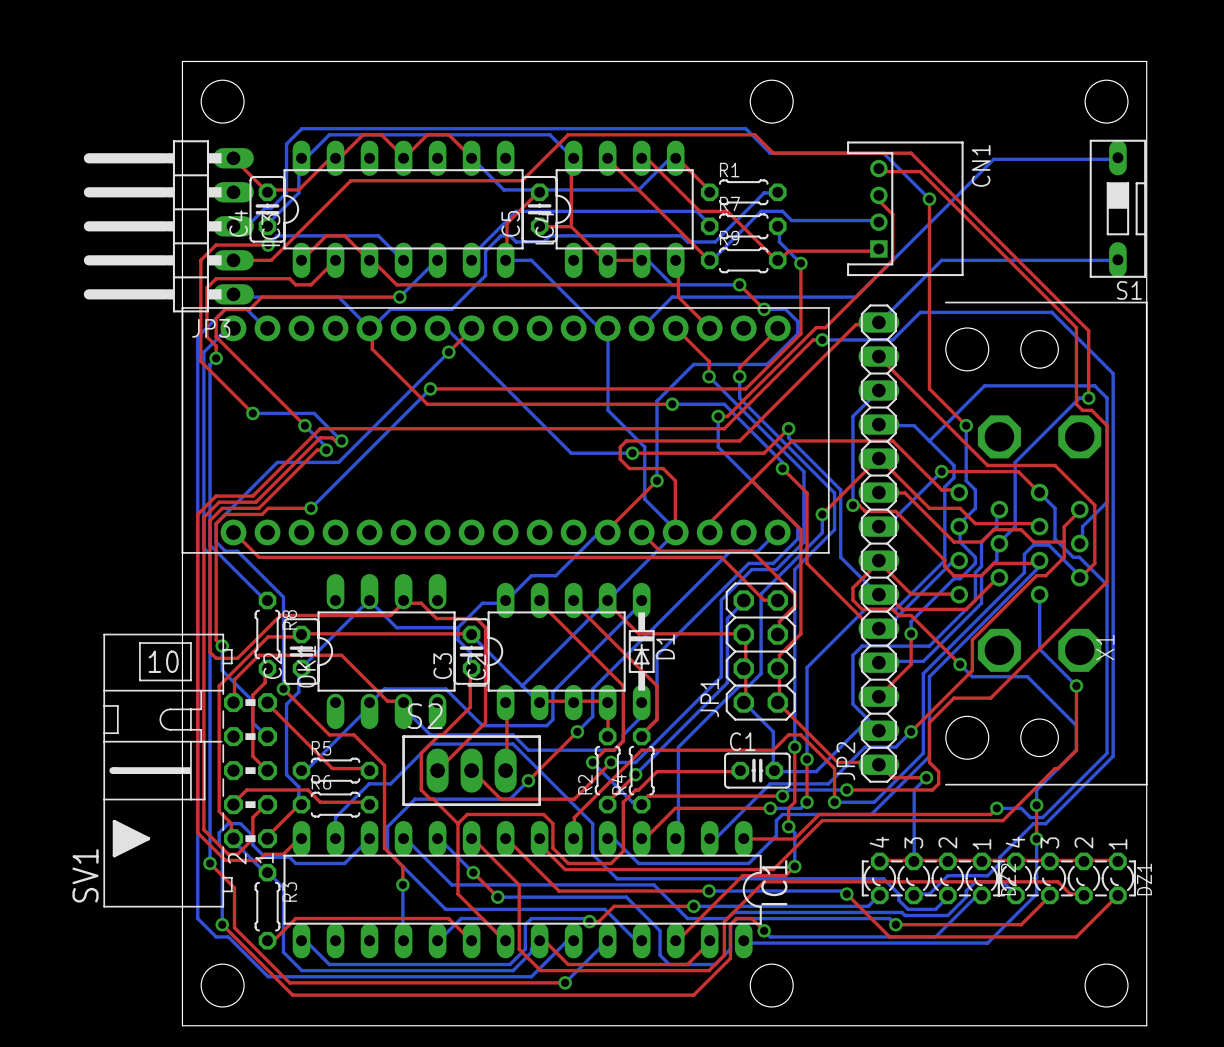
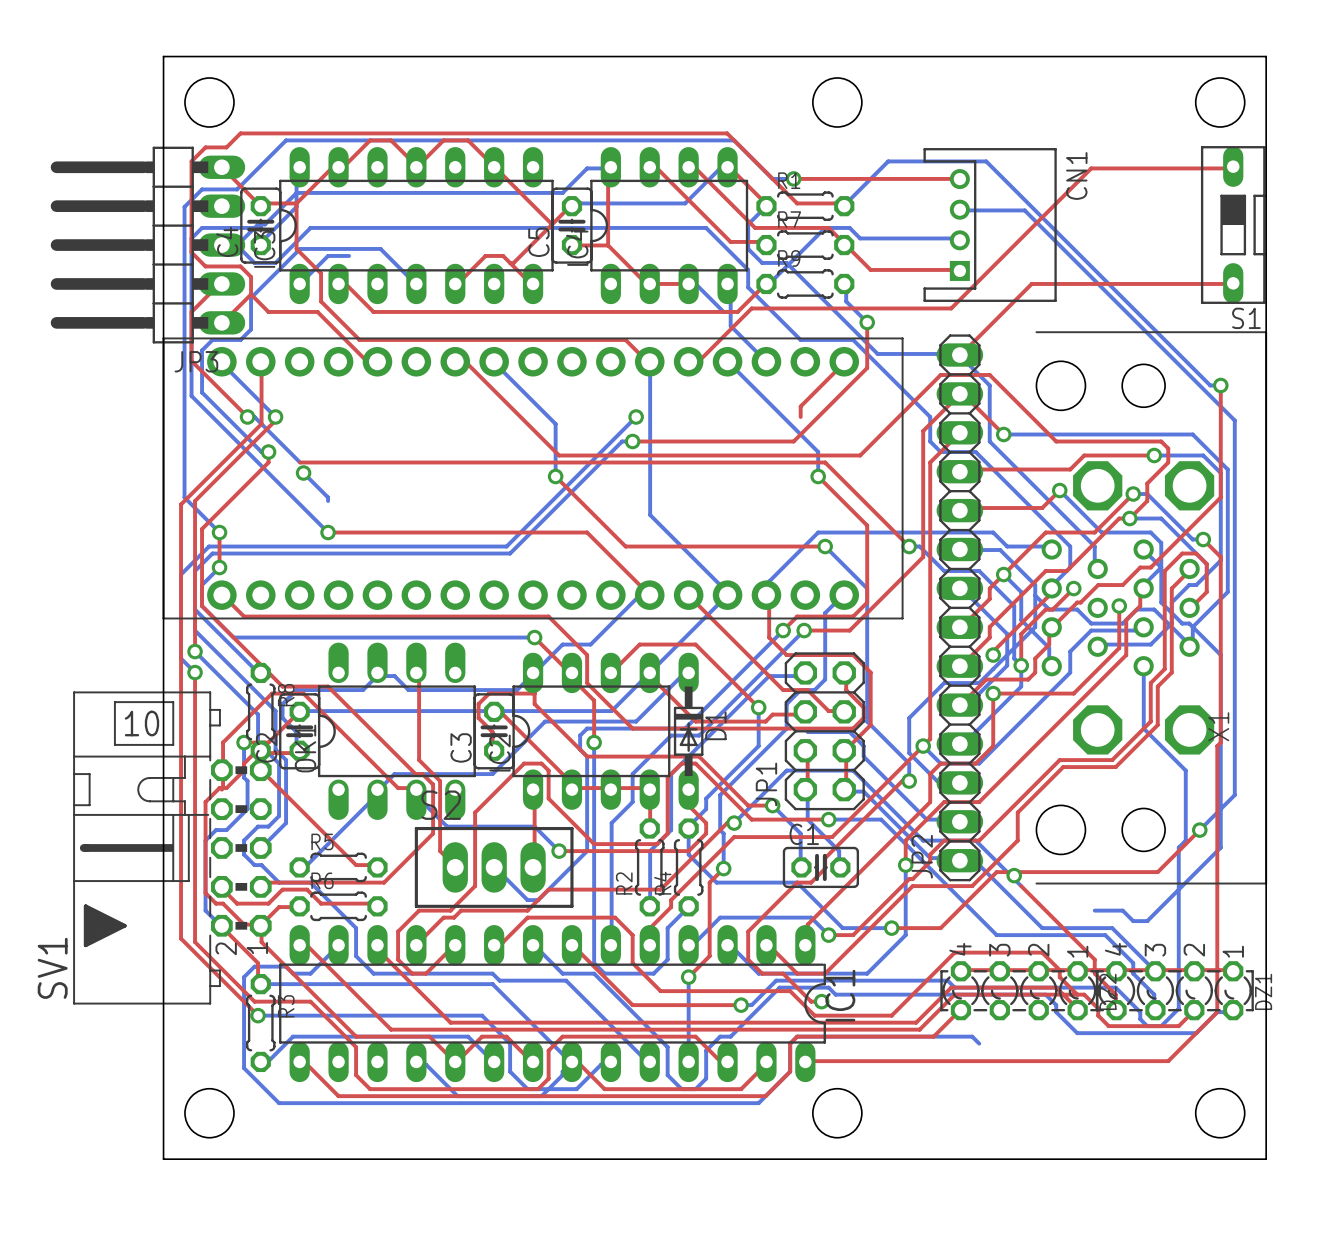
bottom track: (329, 134) (307, 156) (301, 156) (301, 158) -> (331, 140) (286, 140) (237, 189) (202, 189) (184, 206) (184, 497) (219, 532)
bottom track: (549, 134) (573, 158) -> (583, 140) (734, 140) (772, 178) (793, 178)
bottom track: (816, 153) (770, 153) (745, 128) (301, 128) (286, 144) (286, 192) -> (610, 167) (587, 168) (562, 192) (296, 192) (282, 206)
bottom track: (883, 153) (929, 199) -> (965, 161) (986, 161) (1210, 385) (1220, 385)
bottom track: (1117, 157) (1116, 159) (993, 159) (856, 297) (672, 297) (641, 328) -> none
top track: none -> (494, 167) (552, 224)
bottom track: (471, 158) (503, 189) (537, 189) (539, 192) -> none
top track: (608, 159) (709, 260) -> (650, 168) (657, 168) (730, 241) (765, 241) (766, 245)
top track: none -> (793, 178) (959, 179)
via: none -> (793, 178)
top track: (878, 168) (880, 171) (920, 171) (1076, 327) (1076, 404) (1082, 410) (1091, 410) (1107, 425) -> (1220, 385) (1220, 473)
top track: none -> (296, 203) (296, 248) (321, 273) (321, 301) (359, 339) (625, 339) (646, 360) (649, 361)
bottom track: (777, 192) (764, 192) (715, 241) -> (844, 206) (888, 161)
top track: (878, 195) (880, 202) (892, 214) (892, 260) -> (1233, 166) (1231, 168) (1091, 168) (975, 283)
top track: (929, 199) (929, 388) (966, 425) -> none
via: (929, 199) -> none
bottom track: none -> (261, 227) (202, 227) (191, 238) (191, 395) (328, 532)
bottom track: (516, 211) (473, 254) (473, 260) (471, 260) -> (545, 227) (310, 227) (275, 262) (254, 262) (237, 245) (221, 245)
bottom track: (657, 211) (696, 211) (709, 226) -> (706, 227) (734, 255)
top track: (727, 211) (776, 260) (779, 260) (788, 251) (877, 251) (878, 248) -> (786, 227) (828, 227) (870, 269) (959, 270)
top track: (506, 223) (505, 260) -> (534, 241) (513, 262) (510, 262)
bottom track: (777, 226) (779, 226) (779, 241) (800, 263) -> none
bottom track: (326, 235) (277, 235) (268, 245) -> (328, 255) (299, 283)
bottom track: (344, 235) (378, 235) -> (237, 339) (240, 339) (251, 329) (251, 297) (300, 248) (380, 248) (387, 255)
bottom track: (681, 235) (549, 235) (543, 241) (516, 241) (510, 235) (500, 235) (485, 251) (485, 275) (451, 309) (390, 309) (369, 328) (338, 297) (234, 297) (233, 294) -> none
bottom track: (687, 241) (705, 241) -> (766, 206) (748, 224) (748, 248) (762, 262)
bottom track: none -> (741, 262) (748, 269) (748, 287) (800, 339) (828, 339)
bottom track: none -> (772, 262) (786, 262) (877, 353) (959, 355) (989, 385) (989, 441) (1094, 546) (1094, 567) (1097, 568)
top track: (219, 245) (216, 245) (200, 260) (200, 361) (252, 413) -> (205, 266) (191, 252) (191, 161) (205, 147) (226, 147) (240, 133) (727, 133) (797, 203) (842, 203) (844, 206)
top track: (249, 245) (268, 245) -> (240, 266) (251, 276) (251, 294)
via: (268, 245) -> none
bottom track: (1117, 259) (941, 260) (878, 322) -> none
top track: (233, 260) (271, 260) (350, 180) (522, 180) (568, 134) (754, 134) (773, 153) (911, 153) (1088, 330) (1088, 398) -> (221, 283) (219, 283) (191, 311) (191, 315)
top track: (301, 260) (326, 235) (344, 235) (396, 284) -> (338, 283) (345, 283) (373, 311) (408, 311)
top track: (335, 260) (311, 284) -> (377, 361) (366, 360) (317, 311) (310, 311)
top track: none -> (455, 283) (457, 283) (485, 255) (503, 255) (533, 283)
bottom track: (437, 260) (399, 297) -> none
bottom track: (505, 260) (531, 260) (598, 327) (607, 328) -> none
top track: (675, 260) (678, 260) (678, 297) (709, 328) -> none
bottom track: none -> (727, 283) (730, 283) (730, 325) (766, 361)
top track: none -> (765, 283) (737, 311) (730, 311)
bottom track: none -> (844, 283) (846, 283) (846, 301) (867, 322)
top track: (800, 263) (800, 333) (745, 388) (430, 388) -> none
via: (800, 263) -> none
top track: none -> (251, 294) (221, 322)
top track: (871, 281) (825, 327) (816, 327) (727, 416) -> (951, 308) (751, 308) (699, 360) (688, 361)
top track: (295, 284) (289, 278) (216, 278) (206, 287) -> (293, 311) (268, 311) (251, 294)
bottom track: (678, 284) (739, 284) -> none
top track: (739, 284) (764, 309) -> none
via: (739, 284) -> none
top track: none -> (867, 322) (867, 367) (793, 441) (632, 441)
via: none -> (867, 322)
top track: (399, 297) (262, 297) (249, 309) (225, 309) (216, 318) (216, 336) -> none
via: (399, 297) -> none
bottom track: (246, 309) (267, 328) -> none
via: (764, 309) -> none
bottom track: (1051, 312) (920, 312) (892, 339) (822, 339) -> (1157, 343) (1024, 210) (959, 209)
bottom track: (216, 318) (197, 336) (197, 514) -> (202, 350) (202, 392) (261, 452) (268, 452)
bottom track: (797, 321) (797, 333) (767, 364) (693, 364) (657, 401) (657, 480) -> none
top track: (878, 322) (877, 324) (856, 324) (739, 440) (626, 440) (620, 447) (620, 459) (629, 468) (663, 468) (675, 480) (675, 532) -> (959, 355) (1031, 283) (1233, 283)
top track: (206, 327) (206, 336) (216, 346) (216, 358) -> (191, 360) (202, 371)
bottom track: (233, 328) (231, 330) (225, 330) (203, 352) (203, 548) (210, 554) -> (221, 361) (275, 416)
top track: (369, 328) (372, 330) (372, 349) (427, 404) (672, 404) -> none
bottom track: (437, 328) (439, 330) (448, 330) (571, 453) (632, 453) -> none
top track: (471, 328) (448, 352) -> none
bottom track: none -> (494, 361) (555, 424) (555, 476)
top track: (675, 328) (709, 361) (709, 376) -> none
bottom track: none -> (727, 361) (818, 452) (818, 476)
top track: (822, 339) (813, 339) (724, 428) (320, 428) (252, 496) (216, 496) (197, 514) -> (260, 361) (261, 424) (181, 504) (181, 574)
via: (822, 339) -> none
via: none -> (1220, 385)
bottom track: (448, 352) (338, 462) (277, 462) (231, 508) -> none
via: (448, 352) -> none
top track: (878, 356) (987, 465) (1018, 465) -> none
bottom track: (216, 358) (210, 364) (210, 511) -> (632, 441) (622, 441) (510, 553) (212, 553) (195, 571)
via: (216, 358) -> none
bottom track: (1113, 373) (1113, 422) -> (1003, 434) (1192, 434) (1227, 469)
bottom track: none -> (1227, 413) (1234, 420) (1234, 795) (1199, 830)
top track: (255, 376) (304, 425) -> none
bottom track: none -> (247, 416) (254, 416) (300, 462)
via: none -> (247, 416)
via: none -> (275, 416)
bottom track: none -> (636, 416) (506, 546) (209, 546) (181, 574)
via: none -> (636, 416)
bottom track: (709, 376) (803, 471) (803, 542) (776, 569) (751, 569) (721, 600) (721, 676) (635, 762) (611, 762) -> none
via: (709, 376) -> none
bottom track: (739, 376) (739, 398) (834, 493) (834, 529) (794, 569) (794, 664) -> (807, 732) (849, 732) (863, 746)
via: (739, 376) -> none
bottom track: (430, 388) (311, 508) -> none
via: (430, 388) -> none
bottom track: (878, 390) (852, 416) (852, 505) -> none
top track: none -> (1003, 434) (961, 392) (959, 393) (923, 431) (923, 557) (849, 630) (804, 630)
via: none -> (1003, 434)
via: none -> (632, 441)
bottom track: (1088, 398) (1079, 398) (1015, 462) (1015, 526) (996, 545) (996, 560) (993, 563) -> (1140, 630) (1091, 630)
via: (1088, 398) -> none
bottom track: (672, 404) (724, 404) (782, 462) (782, 468) -> none
via: (672, 404) -> none
via: none -> (268, 452)
bottom track: (608, 410) (644, 447) (644, 499) -> (650, 455) (650, 515) (692, 557)
top track: none -> (1154, 455) (1084, 455) (1070, 469) (961, 469) (959, 471)
via: none -> (1154, 455)
bottom track: (252, 413) (314, 413) (341, 440) -> none
via: (252, 413) -> none
top track: none -> (300, 462) (776, 462)
bottom track: (718, 416) (718, 447) (761, 489) -> none
via: (718, 416) -> none
top track: none -> (786, 462) (825, 462) (909, 546)
bottom track: (878, 424) (914, 425) (953, 465) (953, 477) (944, 486) (944, 523) -> (959, 549) (1000, 550) (1035, 585)
bottom track: (966, 425) (966, 480) -> (867, 353) (930, 416) (930, 441) (940, 452) (975, 452) (1059, 536)
via position: (966, 425) -> (1059, 490)
bottom track: (1107, 425) (1107, 398) (1094, 385) (984, 385) (929, 440) -> (1220, 473) (1203, 455) (1154, 455)
top track: none -> (555, 476) (625, 546) (825, 546)
via: none -> (555, 476)
top track: none -> (818, 476) (867, 525) (867, 602) (853, 616) (814, 616)
via: none -> (818, 476)
top track: (788, 428) (764, 453) (632, 453) -> none
bottom track: (788, 428) (788, 437) (840, 489) (840, 557) (878, 594) -> none
via: (788, 428) -> none
top track: (341, 440) (335, 440) (332, 437) (320, 437) (255, 502) (219, 502) (203, 517) (203, 829) (210, 835) -> (195, 732) (195, 942)
via: (341, 440) -> none
top track: none -> (1059, 490) (1042, 508) (961, 508) (959, 510)
bottom track: none -> (1059, 490) (1101, 532) (1150, 532) (1161, 543) (1161, 567) (1143, 585) (1143, 588)
top track: none -> (1133, 494) (1094, 532) (1045, 532) (989, 588) (989, 599) (959, 627)
bottom track: none -> (1133, 494) (1147, 494) (1192, 539) (1203, 539)
via: none -> (1133, 494)
top track: (1107, 447) (1107, 499) -> (1203, 539) (1220, 557)
top track: (326, 450) (317, 450) (259, 508) (222, 508) (210, 520) -> (275, 416) (275, 420) (195, 501) (195, 581)
via: (326, 450) -> none
via: (632, 453) -> none
top track: (1027, 465) (1055, 465) (1085, 496) -> (1129, 518) (1147, 501) (1147, 483) (1168, 462) (1168, 448) (1161, 441) (1056, 441) (989, 374) (940, 374) (860, 455) (559, 455) (468, 364) (457, 364) (455, 361)
bottom track: none -> (1129, 518) (1161, 518) (1206, 564) (1206, 574)
via: none -> (1129, 518)
top track: (782, 468) (807, 493) (807, 563) (871, 627) (878, 628) -> none
via: (782, 468) -> none
top track: (941, 471) (1018, 471) (1039, 492) -> none
bottom track: (941, 471) (889, 523) (880, 523) (878, 526) -> none
via: (941, 471) -> none
top track: none -> (219, 532) (219, 567)
via: none -> (219, 532)
via: none -> (328, 532)
top track: (657, 480) (608, 529) (607, 532) -> (328, 532) (587, 532) (649, 595)
via: (657, 480) -> none
top track: (751, 480) (800, 529) (800, 600) -> none
via: none -> (1203, 539)
via: none -> (825, 546)
via: none -> (909, 546)
top track: (878, 492) (904, 493) (953, 542) (981, 542) (984, 538) -> (959, 705) (986, 679) (1028, 679) (1035, 672) (1035, 658) (1049, 644) (1049, 630) (1077, 602) (1080, 602)
top track: (959, 492) (957, 489) (941, 489) (892, 440) (791, 440) (712, 520) (712, 529) (709, 532) -> none
bottom track: none -> (1051, 549) (1049, 546) (1007, 546) (993, 532) (818, 532) (769, 581) (769, 592) (766, 595)
top track: (852, 505) (859, 505) (865, 511) (895, 511) (944, 560) (944, 566) (953, 575) (981, 575) (993, 563) (1036, 563) (1039, 560) -> none
via: (852, 505) -> none
via: none -> (219, 567)
top track: (311, 508) (268, 508) (262, 514) (225, 514) (216, 523) -> (268, 452) (268, 462) (202, 529) (202, 585)
via: (311, 508) -> none
bottom track: (999, 509) (996, 511) (996, 526) (981, 542) (981, 566) (975, 572) (975, 581) -> (1077, 644) (1070, 651)
top track: (822, 514) (878, 458) (929, 508) (960, 508) (975, 523) (999, 523) -> none
bottom track: (822, 514) (822, 532) (761, 594) -> (825, 613) (825, 665)
via: (822, 514) -> none
bottom track: none -> (1003, 574) (1021, 592) (1021, 620) (1049, 648) (1049, 665) (1051, 666)
via: none -> (1003, 574)
top track: (1021, 523) (1036, 523) (1039, 526) -> (1122, 585) (1140, 567) (1150, 567) (1220, 497)
bottom track: (1085, 523) (1082, 526) (1082, 542) -> (1196, 585) (1189, 585) (1171, 602) (1171, 623) (1150, 644) (1098, 644) (1097, 646)
top track: none -> (1051, 588) (1049, 588) (1049, 595) (993, 651) (993, 655)
bottom track: (959, 526) (960, 542) (975, 557) (975, 563) (960, 578) (953, 578) (911, 621) (911, 633) -> none
top track: none -> (1073, 588) (1052, 609) (1045, 609) (1021, 634) (1021, 665)
via: none -> (1073, 588)
top track: none -> (1143, 588) (1140, 588) (1140, 606) (1126, 620) (1126, 655) (979, 802) (944, 802) (905, 840) (905, 865)
top track: (993, 529) (1021, 529) (1033, 542) (1064, 542) -> (1091, 592) (1098, 585)
top track: (1094, 529) (1094, 563) (1079, 577) -> (1206, 592) (1189, 607)
bottom track: (1113, 529) (1113, 756) (1045, 823) (1033, 823) (999, 857) (999, 863) (987, 875) -> (1227, 592) (1192, 627) (1192, 644) (1189, 646)
bottom track: (797, 538) (773, 563) (748, 563) (657, 655) (657, 710) -> (758, 707) (758, 746) (706, 798)
bottom track: none -> (867, 602) (867, 721) (909, 763) (909, 781)
top track: (216, 542) (216, 639) (222, 646) -> (202, 606) (282, 686) (328, 686) (415, 774) (422, 774) (433, 784) (433, 833) (384, 882) (265, 882) (260, 886)
via: none -> (1119, 606)
bottom track: (761, 548) (758, 551) (730, 551) (626, 655) -> (804, 630) (699, 735) (671, 735)
bottom track: (225, 551) (237, 551) (283, 597) (283, 679) -> (195, 651) (258, 714) (258, 742) (279, 763)
bottom track: none -> (212, 616) (233, 637) (534, 637)
top track: (252, 551) (259, 557) (721, 557) (764, 600) (777, 600) -> (244, 616) (548, 616) (587, 655) (587, 683) (632, 728) (853, 728)
top track: (660, 551) (736, 551) -> (783, 630) (797, 616)
top track: none -> (709, 616) (783, 690) (807, 690) (828, 711) (844, 711)
top track: (751, 551) (785, 584) -> (766, 595) (769, 595) (769, 637) (786, 655) (853, 655)
bottom track: (1024, 554) (1024, 572) (923, 673) (923, 753) (874, 802) (834, 802) -> (1126, 620) (1122, 623) (1091, 623) (1077, 609) (1049, 609) (1035, 595)
top track: (1064, 557) (1045, 575) (1036, 575) (972, 639) (972, 670) (966, 676) -> (1171, 623) (1171, 672) (1157, 686) (1157, 725) (1115, 767) (1063, 767) (1045, 784)
bottom track: (959, 560) (957, 563) (950, 563) (920, 594) -> (959, 588) (1007, 634) (1007, 665)
bottom track: (210, 563) (210, 863) -> (195, 630) (275, 711) (275, 749) (286, 760) (286, 823) (260, 847)
via: none -> (783, 630)
via: none -> (804, 630)
bottom track: (1036, 563) (1036, 569) (929, 676) (929, 756) (871, 814) (782, 814) (776, 820) (776, 835) (748, 863) -> (905, 865) (905, 935) (867, 973) (811, 973)
top track: none -> (534, 637) (571, 672) (569, 676) (594, 700) (594, 742)
via: none -> (534, 637)
bottom track: (981, 575) (981, 603) (923, 661) (878, 662) -> (909, 546) (919, 546) (944, 571) (979, 571) (1014, 606) (1014, 658) (1021, 665) (1021, 686) (961, 746) (959, 744)
top track: (999, 577) (966, 609) (901, 609) (889, 597) (880, 597) (878, 594) -> (1119, 518) (1066, 571) (1045, 571) (989, 627) (989, 637) (959, 666)
top track: (210, 581) (210, 600) -> none
via: none -> (195, 651)
top track: (1107, 581) (1045, 643) -> (1196, 553) (1182, 553) (1164, 571) (1164, 669) (1150, 683) (1150, 721)
top track: none -> (1220, 651) (1220, 742) (1217, 746) (1217, 1012) (1168, 1061) (805, 1061)
via: none -> (993, 655)
bottom track: (197, 587) (197, 918) (216, 936) (228, 936) (268, 976) (283, 976) -> (181, 658) (195, 672)
top track: (852, 587) (878, 560) (911, 594) (959, 594) -> (930, 658) (930, 462) (959, 432)
top track: (794, 594) (794, 606) (779, 621) (779, 633) (777, 634) -> (863, 665) (870, 672)
via: none -> (1021, 665)
via: none -> (195, 672)
bottom track: (369, 600) (298, 670) (298, 692) (286, 704) (286, 774) (298, 786) (298, 802) (301, 804) -> (377, 672) (377, 676) (363, 690) (296, 690) (282, 704) (282, 718) (296, 732) (296, 749) (299, 750)
top track: (403, 600) (390, 615) (280, 615) (277, 618) -> none
top track: none -> (533, 672) (534, 704) (587, 756) (699, 756) (748, 805) (772, 805)
top track: (539, 600) (623, 685) (623, 692) -> (828, 819) (751, 819) (695, 763) (681, 763) (667, 777)
top track: (573, 600) (657, 685) (657, 719) (641, 736) -> (610, 672) (639, 644) (695, 644) (758, 707)
top track: (852, 600) (862, 609) (892, 609) (898, 615) (911, 615) (960, 664) -> none
bottom track: (372, 603) (396, 627) (458, 627) -> (380, 676) (394, 676) (408, 690) (517, 690) (531, 676)
top track: (405, 603) (421, 603) (436, 618) (467, 618) -> none
bottom track: (503, 603) (482, 603) (458, 627) -> none
bottom track: (641, 603) (552, 692) -> (783, 630) (685, 728) (587, 728) (580, 735) (580, 749) (587, 756) (587, 777)
bottom track: none -> (688, 676) (681, 676) (636, 721) (545, 721) (492, 774) (464, 774)
bottom track: (742, 603) (727, 618) (727, 627) -> (825, 679) (814, 690) (800, 690) (786, 704)
bottom track: (761, 606) (761, 673) (748, 685) -> none
top track: (476, 618) (485, 627) (485, 722) (437, 770) -> (419, 676) (419, 760) (440, 781) (440, 851) (455, 867)
top track: none -> (499, 693) (534, 693)
bottom track: (458, 627) (458, 639) (470, 652) (471, 668) -> none
via: none -> (758, 707)
bottom track: (574, 633) (522, 685) -> (611, 711) (299, 711)
top track: (638, 633) (742, 633) (745, 636) (745, 667) (743, 668) -> (685, 711) (695, 721) (765, 721) (772, 714) (804, 714) (805, 711)
top track: (800, 633) (794, 639) -> (844, 672) (846, 676) (846, 690) (863, 707) (863, 718)
top track: (911, 633) (911, 664) (878, 696) -> none
via position: (911, 633) -> (993, 693)
top track: (301, 634) (471, 634) -> (571, 789) (569, 788) (569, 781) (503, 714) (496, 714) (494, 711)
bottom track: (471, 634) (539, 702) -> none
top track: (298, 636) (268, 636) (219, 685) (219, 713) -> (299, 750) (296, 753) (254, 753) (244, 763) (244, 770) (226, 788) (219, 788) (205, 802)
top track: none -> (296, 714) (268, 742) (244, 742)
bottom track: (834, 639) (807, 667) (807, 759) -> (909, 718) (909, 753) (937, 781) (958, 781) (959, 782)
bottom track: (222, 646) (222, 670) (252, 701) (252, 722) (267, 736) -> none
via: (222, 646) -> none
bottom track: (929, 646) (862, 646) (852, 655) (852, 704) (877, 728) -> (1017, 725) (979, 763) (940, 763) (923, 746)
bottom track: (727, 649) (727, 682) (635, 774) -> (786, 728) (720, 795) (720, 830) (723, 833) (723, 868)
top track: (785, 649) (779, 655) (779, 667) -> (870, 711) (870, 725) (846, 749)
top track: (210, 652) (216, 658) (237, 658) -> (223, 763) (223, 742) (226, 739)
top track: (341, 655) (259, 655) (234, 679) -> (345, 735) (303, 693) (272, 693)
bottom track: none -> (244, 742) (244, 777) (247, 781) (247, 809) (226, 830) (216, 830) (205, 840) (205, 910) (221, 925)
via: none -> (244, 742)
via: none -> (594, 742)
via: none -> (923, 746)
bottom track: (960, 664) (972, 676) (1027, 676) (1076, 725) -> (1185, 770) (1185, 816)
via: (960, 664) -> none
top track: (267, 668) (265, 670) (265, 682) (252, 695) (252, 756) (267, 770) -> none
top track: (471, 668) (470, 707) -> (494, 750) (492, 732) (478, 718) (478, 704) (489, 693)
bottom track: (794, 673) (794, 747) -> (863, 756) (926, 819) (958, 819)
top track: (1012, 676) (990, 698) (953, 698) -> (1112, 760) (1059, 760)
bottom track: (739, 685) (678, 747) (678, 835) (675, 838) -> (800, 770) (786, 770) (734, 823)
top track: (1076, 685) (1076, 750) -> (1199, 830) (1185, 844)
via: (1076, 685) -> none
top track: (283, 688) (329, 734) (353, 734) (384, 765) (384, 848) (387, 851) -> none
via: (283, 688) -> none
bottom track: (445, 688) (482, 725) (546, 725) (552, 719) -> (559, 879) (587, 851) (587, 809)
via: none -> (909, 781)
top track: (267, 702) (332, 768) (350, 768) -> (260, 770) (356, 865)
top track: none -> (688, 789) (688, 805) (706, 823) (706, 833) (688, 851) (559, 851)
bottom track: (641, 702) (641, 716) (623, 734) (623, 741) -> (804, 676) (769, 676) (671, 774) (671, 830) (667, 833)
top track: (777, 702) (837, 762) (877, 762) (892, 777) (926, 777) -> none
bottom track: none -> (844, 789) (846, 791) (863, 791) (930, 858) (958, 858) (961, 861) (975, 861) (1042, 928) (1112, 928) (1155, 971)
bottom track: (745, 704) (773, 731) (773, 756) -> (807, 791) (807, 819) (839, 851)
bottom track: (592, 713) (592, 716) (577, 731) -> (632, 802) (611, 823) (610, 945)
bottom track: none -> (772, 805) (800, 833) (801, 867)
via: none -> (772, 805)
bottom track: (868, 719) (816, 771) (774, 770) -> none
top track: (454, 722) (421, 753) (421, 789) (430, 799) (433, 799) (458, 823) -> (475, 812) (475, 886) (450, 910) (419, 910) (398, 931) (398, 959)
bottom track: none -> (828, 819) (881, 819) (996, 935) (1105, 935) (1133, 963) (1133, 973) (1154, 994) (1155, 1010)
via: none -> (828, 819)
top track: (577, 731) (528, 780) -> none
via: (577, 731) -> none
top track: none -> (734, 823) (727, 823) (660, 889) (548, 889) (527, 910) (461, 910) (454, 917) (443, 917) (416, 945)
via: none -> (734, 823)
top track: none -> (996, 823) (979, 840) (944, 840) (930, 854) (930, 861) (912, 879) (909, 879) (853, 935) (828, 935)
bottom track: (911, 731) (895, 747) (892, 747) -> (1021, 886) (975, 840)
via: (911, 731) -> none
bottom track: (506, 734) (513, 734) (528, 750) (614, 750) -> (534, 826) (559, 851)
top track: (788, 734) (800, 734) (834, 768) (834, 802) -> (856, 826) (902, 781) (909, 781)
bottom track: none -> (688, 828) (688, 854) (716, 882) (797, 882) (842, 928) (891, 928)
via: none -> (1199, 830)
top track: (794, 747) (794, 802) (788, 808) (788, 826) -> none
via: (794, 747) -> none
bottom track: (865, 747) (828, 783) (770, 783) (718, 835) (712, 835) (709, 838) -> (944, 840) (923, 840) (853, 770) (811, 770)
top track: (929, 747) (929, 762) (938, 771) (938, 783) (932, 789) (846, 789) -> (1017, 840) (972, 886) (912, 886) (825, 973) (797, 973) (769, 945) (766, 945)
bottom track: (1076, 747) (1076, 750) (1036, 789) (1036, 805) -> (1185, 840) (1178, 847) (1178, 1008) (1161, 1026) (1147, 1026) (1140, 1019) (1140, 1012) (1115, 987) (1084, 987)
top track: (604, 750) (592, 762) -> (646, 844) (594, 844) (548, 798) (548, 770) (541, 763) (524, 763) (492, 795)
bottom track: none -> (657, 844) (650, 851) (649, 906)
top track: (773, 750) (641, 750) (574, 817) (573, 838) -> (839, 844) (825, 858) (825, 868) (811, 882) (797, 882) (748, 931) (748, 959) (762, 973) (783, 973) (811, 1001) (821, 1001)
top track: (807, 759) (807, 802) -> none
via: (807, 759) -> none
bottom track: (592, 762) (632, 802) (641, 802) (641, 804) -> (594, 742) (594, 963) (604, 973) (653, 973) (667, 959) (667, 928) (688, 906)
via: (592, 762) -> none
top track: (611, 762) (574, 799) (500, 799) (471, 770) -> none
via: (611, 762) -> none
via: none -> (905, 865)
top track: (1058, 768) (1055, 768) (1002, 820) (822, 820) (773, 869) (565, 869) (540, 845) (540, 838) -> (1164, 865) (1157, 872) (996, 872) (940, 928) (891, 928)
SV1 position: (190, 770) -> (172, 847)
bottom track: none -> (494, 867) (527, 900)
top track: (740, 770) (657, 771) (638, 789) (635, 789) -> (930, 672) (930, 739) (832, 837) (734, 837) (681, 889)
top track: none -> (723, 868) (709, 882) (709, 956) (688, 977)
via: none -> (723, 868)
top track: (635, 774) (607, 804) -> none
via: (635, 774) -> none
bottom track: (926, 777) (914, 789) (913, 861) -> none
via position: (528, 780) -> (559, 851)
top track: none -> (1021, 886) (1094, 959) (1094, 973) (1115, 994) (1116, 1010)
top track: (286, 789) (246, 789) (233, 804) -> (282, 889) (268, 903) (237, 903) (221, 886)
bottom track: (846, 789) (788, 789) (782, 796) -> none
via: (846, 789) -> none
top track: (219, 793) (219, 811) (231, 823) (231, 835) (233, 838) -> (205, 893) (216, 903) (223, 903) (244, 924) (260, 925)
top track: (782, 796) (647, 796) (641, 804) -> none
via: (782, 796) -> none
bottom track: (500, 799) (415, 799) (387, 826) (387, 851) (445, 909) (604, 909) -> (533, 945) (562, 973) (594, 973) (646, 1026)
top track: (626, 799) (623, 802) (623, 851) (611, 863) (568, 863) (552, 848) (552, 823) (543, 814) -> (671, 900) (671, 907) (650, 928) (649, 945)
bottom track: (807, 802) (800, 808) (770, 808) -> none
via: (807, 802) -> none
via: (834, 802) -> none
top track: (267, 804) (252, 817) (252, 838) (237, 854) (228, 854) -> (548, 1071) (548, 1078) (538, 1089) (370, 1089) (356, 1075) (356, 1047) (310, 1001) (254, 1001) (216, 963)
top track: (298, 805) (267, 838) -> (296, 907) (279, 907) (260, 925)
top track: (1036, 805) (1036, 838) -> none
via: (1036, 805) -> none
top track: (770, 808) (675, 808) (647, 835) (641, 835) (641, 838) -> none
via: (770, 808) -> none
top track: (996, 808) (990, 814) (819, 814) (794, 838) (743, 838) -> (1119, 606) (1119, 648) (1073, 693) (993, 693) (993, 746) (975, 763) (940, 763) (930, 774) (930, 802) (807, 924) (807, 942) (805, 945)
via: (996, 808) -> none
top track: (500, 814) (467, 814) (458, 823) -> (527, 917) (503, 942) (496, 942) (494, 945)
top track: none -> (576, 917) (615, 917) (632, 935) (632, 963) (660, 991) (790, 991) (814, 1015) (891, 1015) (954, 952) (1042, 952) (1059, 970) (1059, 977) (1077, 994)
top track: none -> (221, 925) (258, 963) (258, 984) (260, 984)
top track: (458, 823) (458, 894) (482, 918) -> none
via: none -> (891, 928)
bottom track: (788, 826) (794, 832) (794, 866) -> none
via: (788, 826) -> none
bottom track: none -> (828, 935) (811, 917) (720, 917) (695, 942) (688, 942) (688, 945)
via: none -> (828, 935)
bottom track: (233, 838) (231, 838) (265, 872) (267, 872) -> none
top track: (301, 838) (298, 838) (283, 854) (265, 854) (259, 860) (225, 860) -> (258, 1015) (212, 970)
top track: none -> (299, 945) (307, 945) (391, 1029) (919, 1029) (954, 994)
bottom track: (335, 838) (335, 817) (369, 783) (390, 783) (430, 744) (513, 744) (592, 823) (592, 854) (617, 878) (883, 878) (898, 894) (898, 900) (908, 909) (935, 909) (947, 897) -> none
bottom track: (369, 838) (344, 863) (311, 863) -> (338, 945) (310, 973)
bottom track: (403, 838) (451, 884) (653, 884) (687, 918) (727, 918) (733, 912) (901, 912) (904, 915) (947, 915) (966, 897) (966, 891) (975, 881) (1002, 881) (1015, 895) -> none
bottom track: (437, 838) (473, 872) -> none
top track: (471, 838) (519, 884) (519, 930) -> (727, 1061) (720, 1061) (695, 1036) (562, 1036) (548, 1050)
top track: (505, 838) (559, 891) (592, 891) -> (573, 945) (632, 1005)
bottom track: (607, 838) (614, 838) (638, 863) (702, 863) -> (727, 945) (730, 945) (758, 973)
bottom track: (1036, 838) (1036, 894) (987, 943) (745, 943) (743, 940) -> none
via: (1036, 838) -> none
bottom track: (265, 857) (252, 845) (252, 835) (240, 823) (228, 823) (219, 832) (219, 845) (222, 848) (222, 924) -> (258, 966) (254, 966) (244, 977) (244, 1068) (279, 1103)
top track: (210, 863) (234, 887) (234, 927) (289, 982) (565, 982) -> none
via: (210, 863) -> none
top track: (399, 863) (402, 866) (402, 884) -> (412, 973) (426, 973) (455, 945)
via: none -> (688, 977)
top track: (794, 866) (785, 875) (742, 875) (675, 940) -> none
via: (794, 866) -> none
bottom track: (268, 872) (283, 887) (283, 952) (301, 970) (439, 970) -> (261, 984) (492, 984) (571, 1061)
top track: (473, 872) (497, 897) -> none
via: (473, 872) -> none
bottom track: (947, 875) (929, 894) (913, 895) -> (1038, 987) (954, 987) (947, 980) (776, 980) (751, 1005) (741, 1005)
top track: (874, 881) (764, 881) (724, 921) (724, 955) -> (790, 1071) (783, 1078)
top track: (987, 881) (1058, 881) (1070, 894) (1083, 895) -> (1084, 994) (1098, 1008) (1098, 1015) (1108, 1026) (1178, 1026) (1194, 1010)
bottom track: (402, 884) (403, 940) -> (457, 1096) (426, 1064) (419, 1064) (416, 1061)
via: (402, 884) -> none
via: none -> (821, 1001)
top track: (687, 891) (709, 891) -> none
via: none -> (741, 1005)
bottom track: (709, 891) (843, 891) (846, 894) -> none
via: (709, 891) -> none
top track: (846, 894) (889, 936) (1076, 936) (1117, 895) -> none
via: (846, 894) -> none
bottom track: (879, 895) (868, 906) (693, 906) -> none
top track: none -> (1077, 1010) (1056, 987) (951, 987) (916, 1022) (748, 1022)
bottom track: (981, 895) (981, 897) (975, 897) (935, 936) (770, 936) (764, 930) -> none
top track: (1049, 895) (1021, 924) (895, 924) -> none
bottom track: none -> (1233, 1010) (1231, 1012) (1217, 1012) (1196, 1033) (1077, 1033) (1056, 1012) (1056, 1005) (1045, 994) (835, 994) (828, 987) (779, 987) (730, 1036) (720, 1036) (706, 1050) (706, 1078) (695, 1089) (681, 1089) (667, 1075) (667, 1047)
bottom track: (497, 897) (626, 897) (660, 930) (660, 955) (669, 964) (715, 964) -> (562, 1103) (758, 1103) (772, 1089)
via: (497, 897) -> none
via: none -> (258, 1015)
top track: (614, 906) (598, 921) (589, 921) -> (657, 1022) (450, 1022) (380, 952) (380, 945) (377, 945)
via: (693, 906) -> none
top track: (350, 918) (295, 918) (274, 940) (267, 940) -> (356, 1036) (261, 942) (260, 925)
top track: (415, 918) (448, 918) (471, 940) -> (429, 1036) (455, 1061) (482, 1036) (506, 1036)
top track: (751, 918) (764, 930) -> (814, 1036) (933, 1036) (960, 1010)
bottom track: (589, 921) (586, 918) (531, 918) (525, 924) (525, 949) (510, 964) -> none
via: (589, 921) -> none
top track: (222, 924) (292, 995) (693, 995) (730, 958) (730, 949) -> none
via: (222, 924) -> none
via: (895, 924) -> none
bottom track: (623, 927) (635, 940) (641, 940) -> (688, 977) (688, 1061)
via: (764, 930) -> none
bottom track: none -> (260, 1061) (268, 1061) (293, 1036) (468, 1036) (494, 1061)
bottom track: (301, 940) (301, 943) (307, 943) (329, 964) (500, 964) -> (258, 1015) (482, 1015) (510, 1043) (510, 1071) (527, 1089)
bottom track: (437, 940) (461, 918) (482, 918) (505, 940) -> none
bottom track: (607, 940) (565, 982) -> (649, 1061) (646, 1061) (566, 980) (499, 980) (492, 973) (373, 973) (356, 956) (356, 928) (310, 882) (279, 882) (261, 865) (254, 865) (244, 854) (244, 840) (258, 826) (268, 826) (279, 816) (279, 774)
top track: (519, 949) (540, 970) -> (299, 1061) (300, 1064) (307, 1064) (338, 1096) (573, 1096)
bottom track: (543, 964) (531, 976) -> (576, 1089) (538, 1089)
via: (565, 982) -> none

